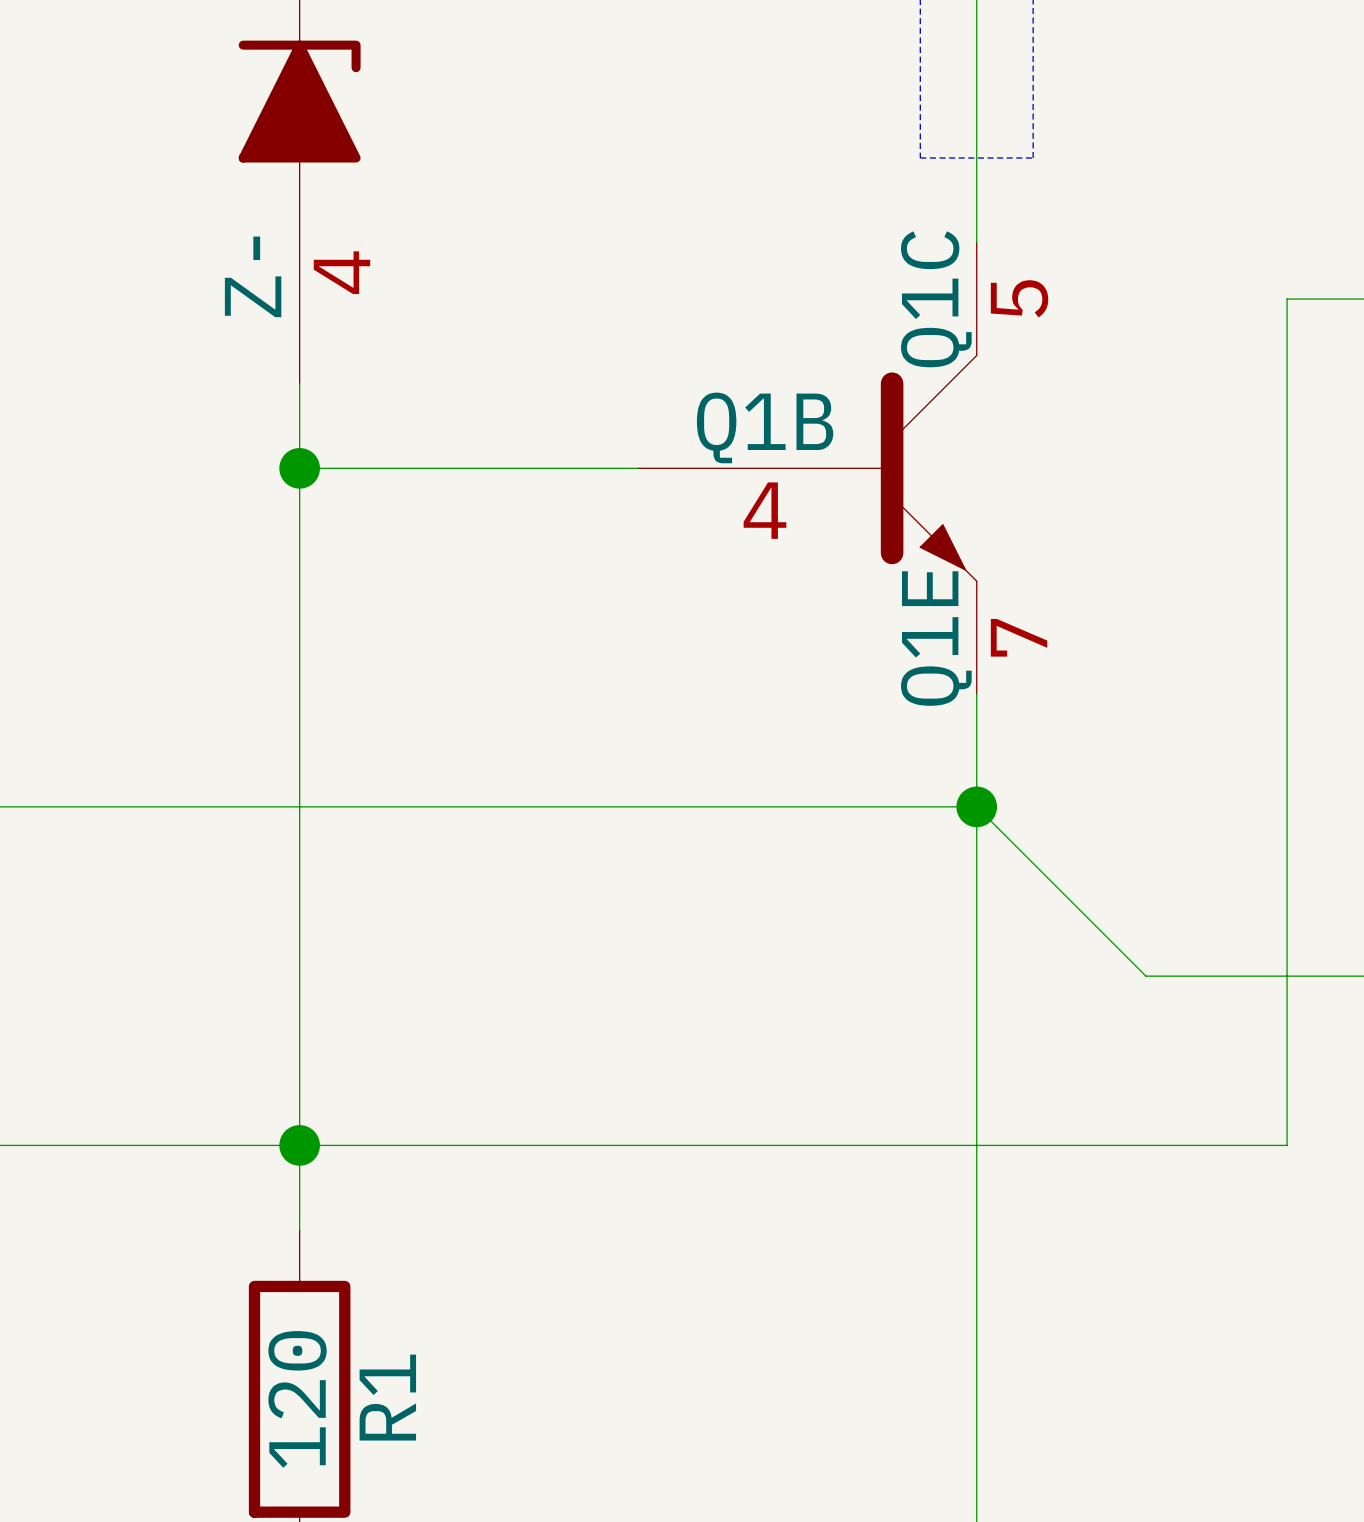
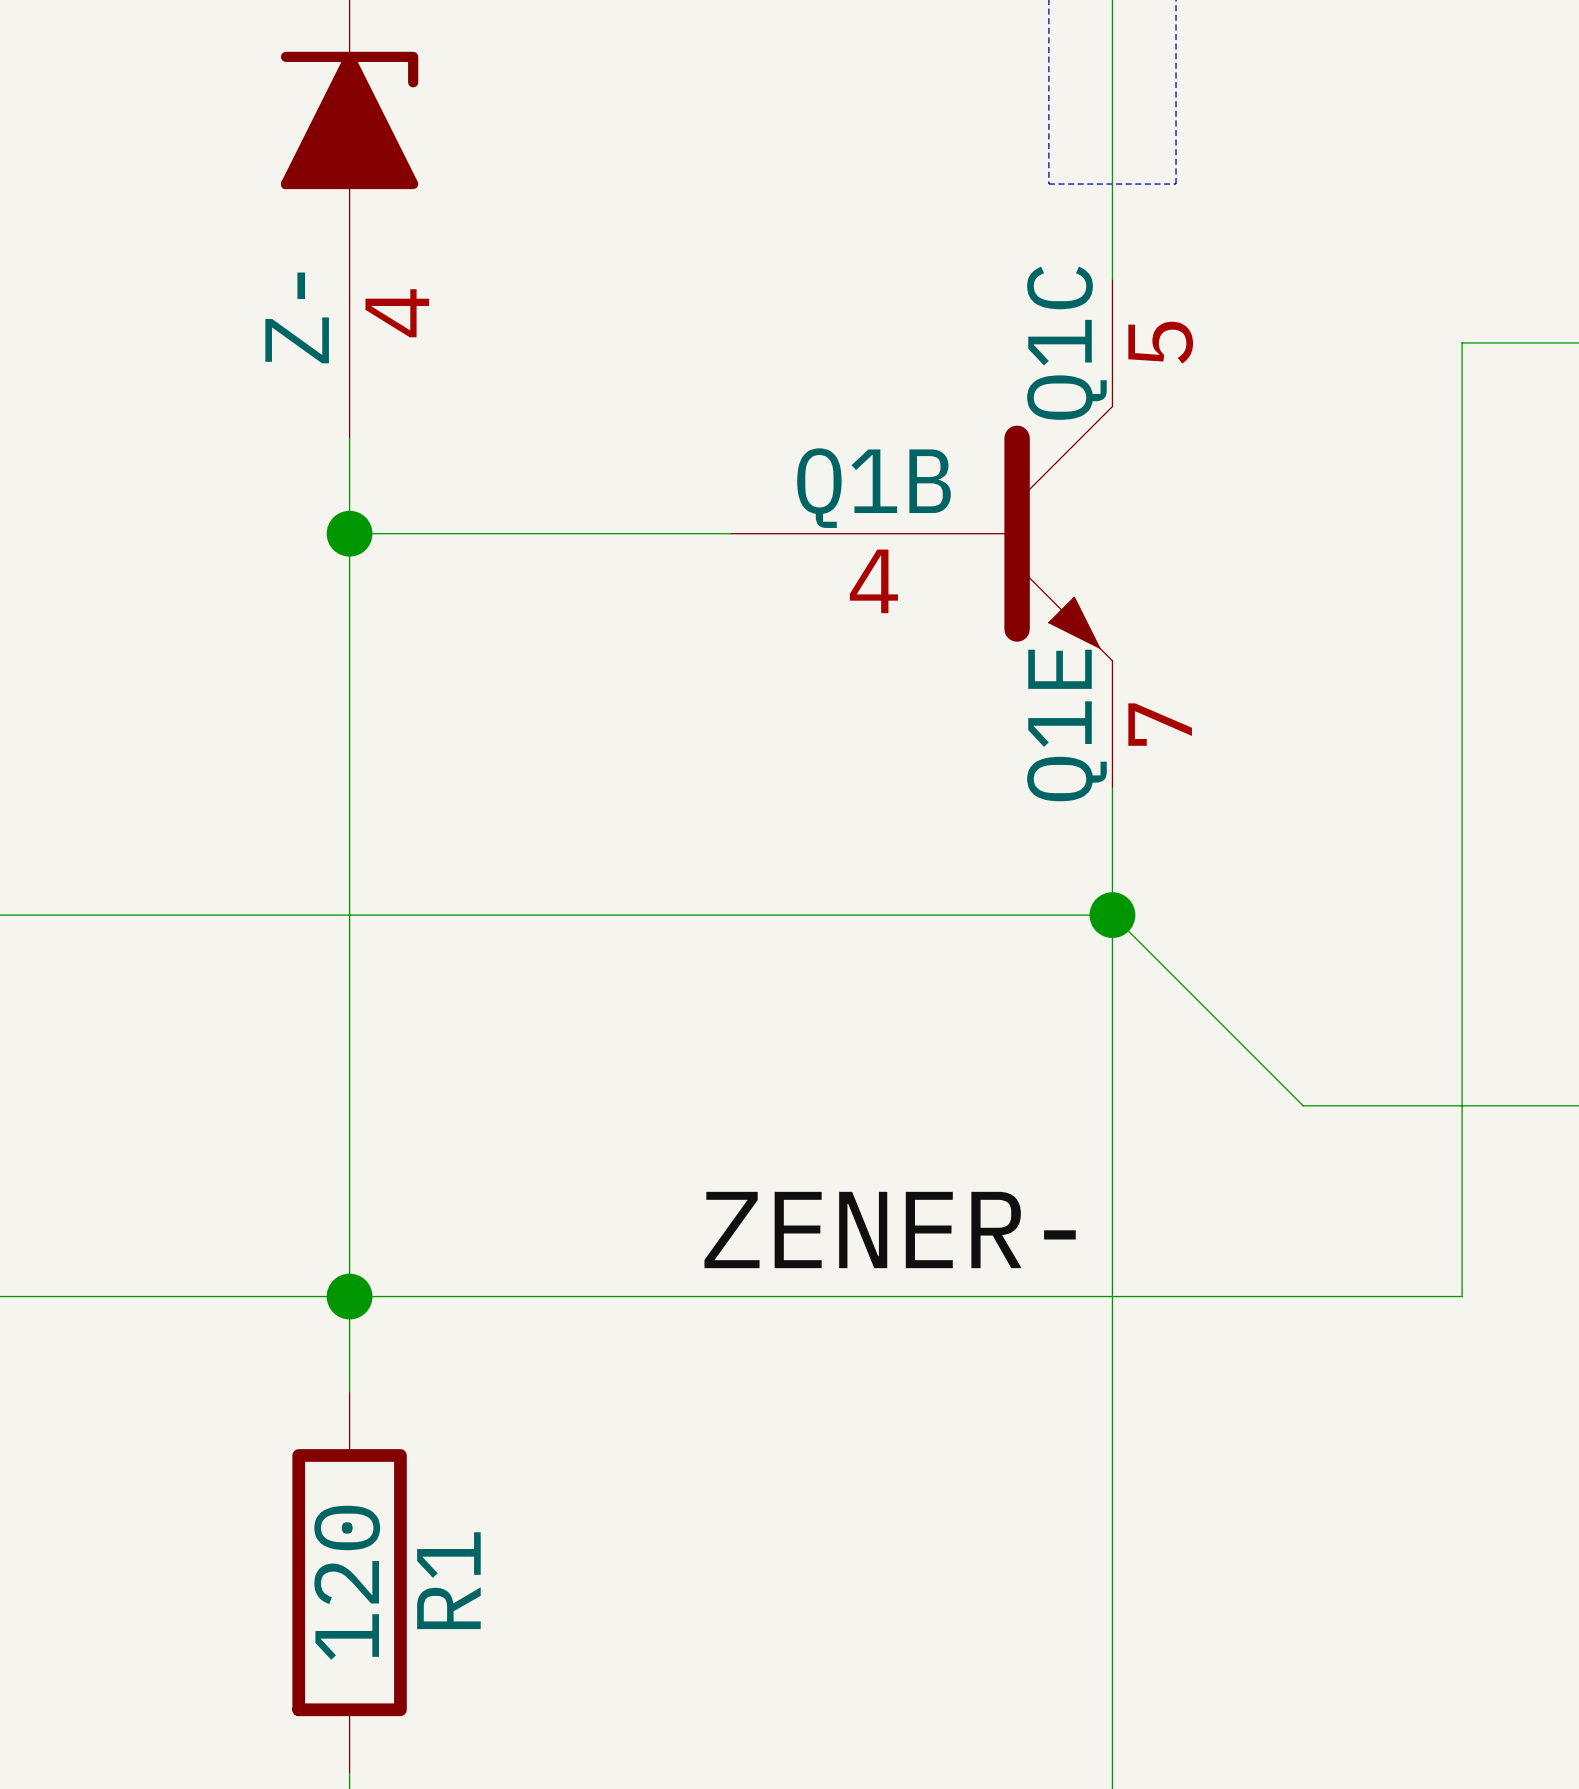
label: none -> ZENER- (890, 1229)

